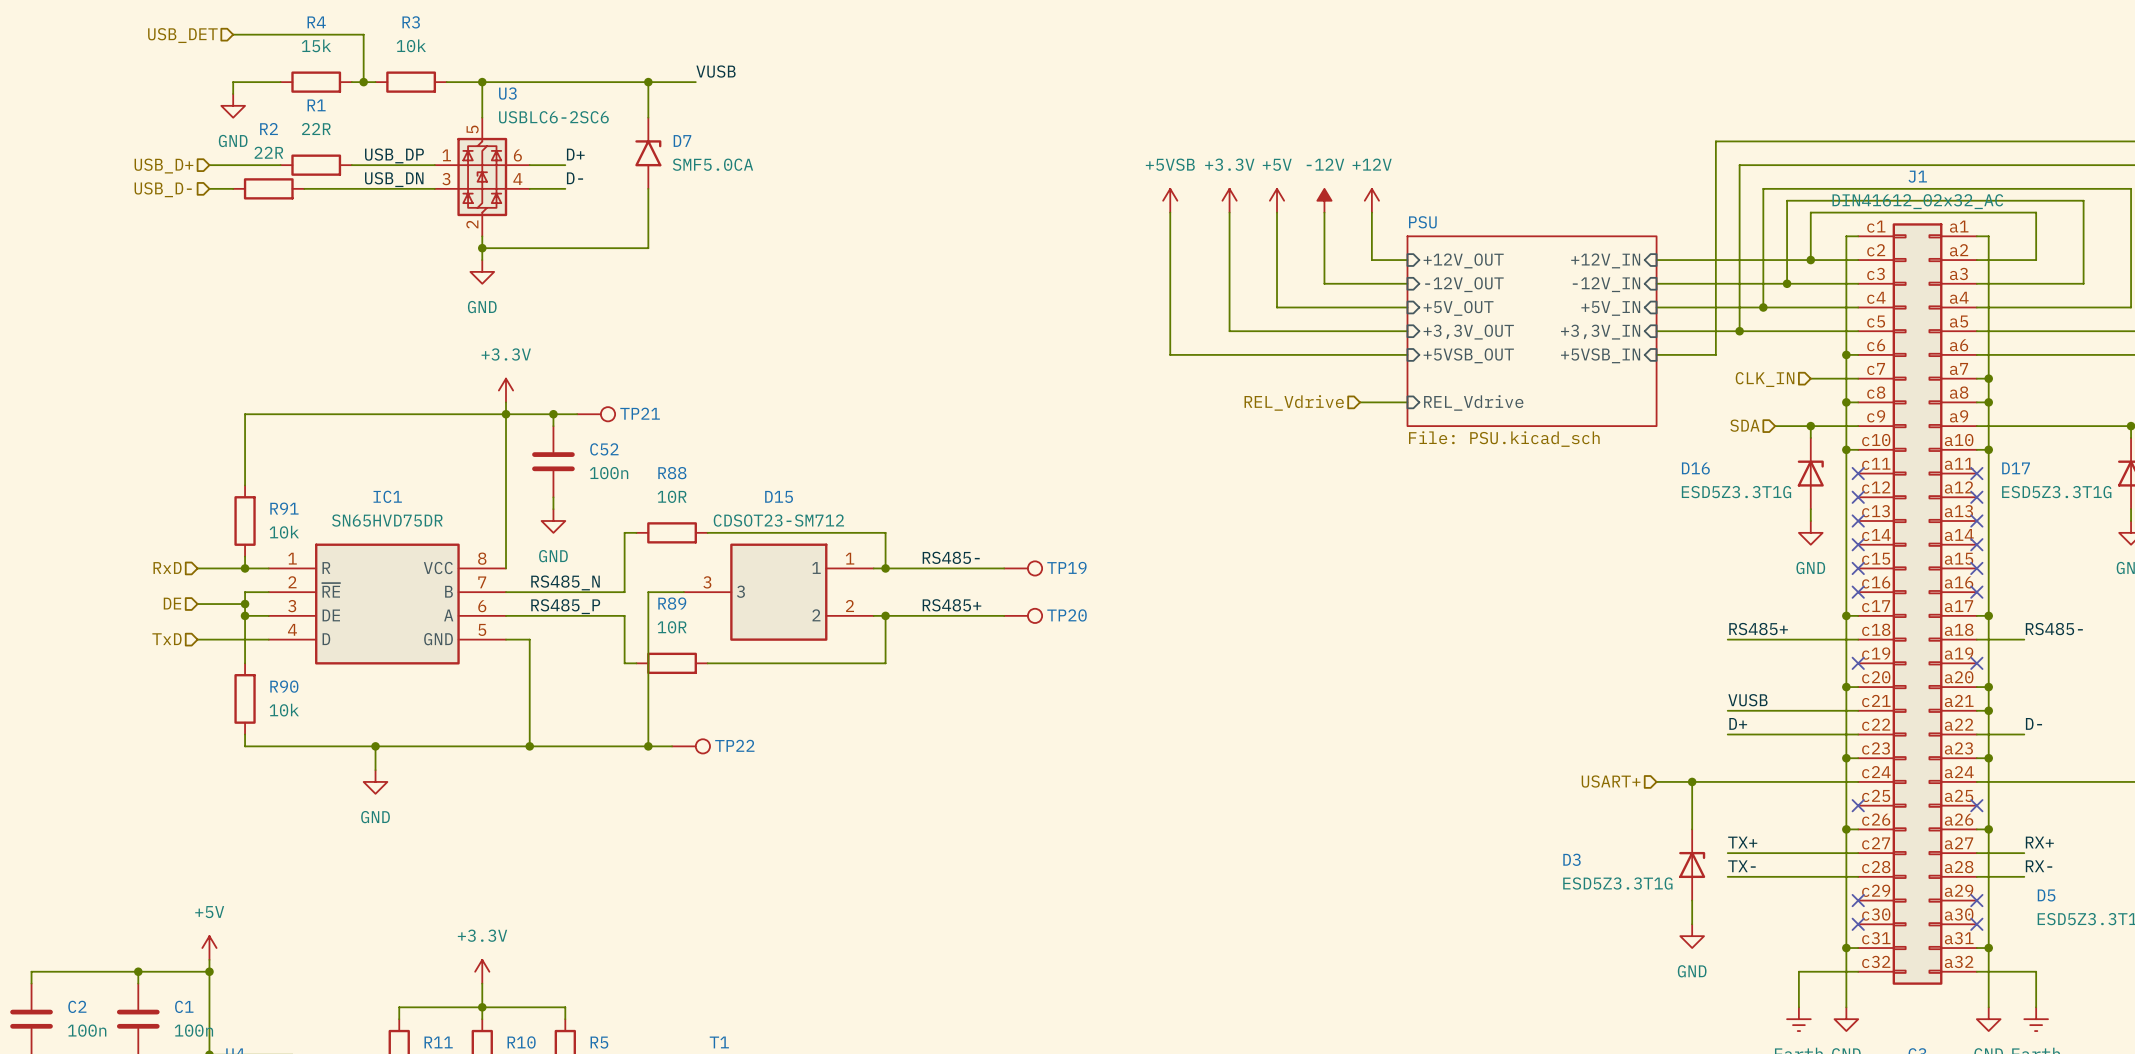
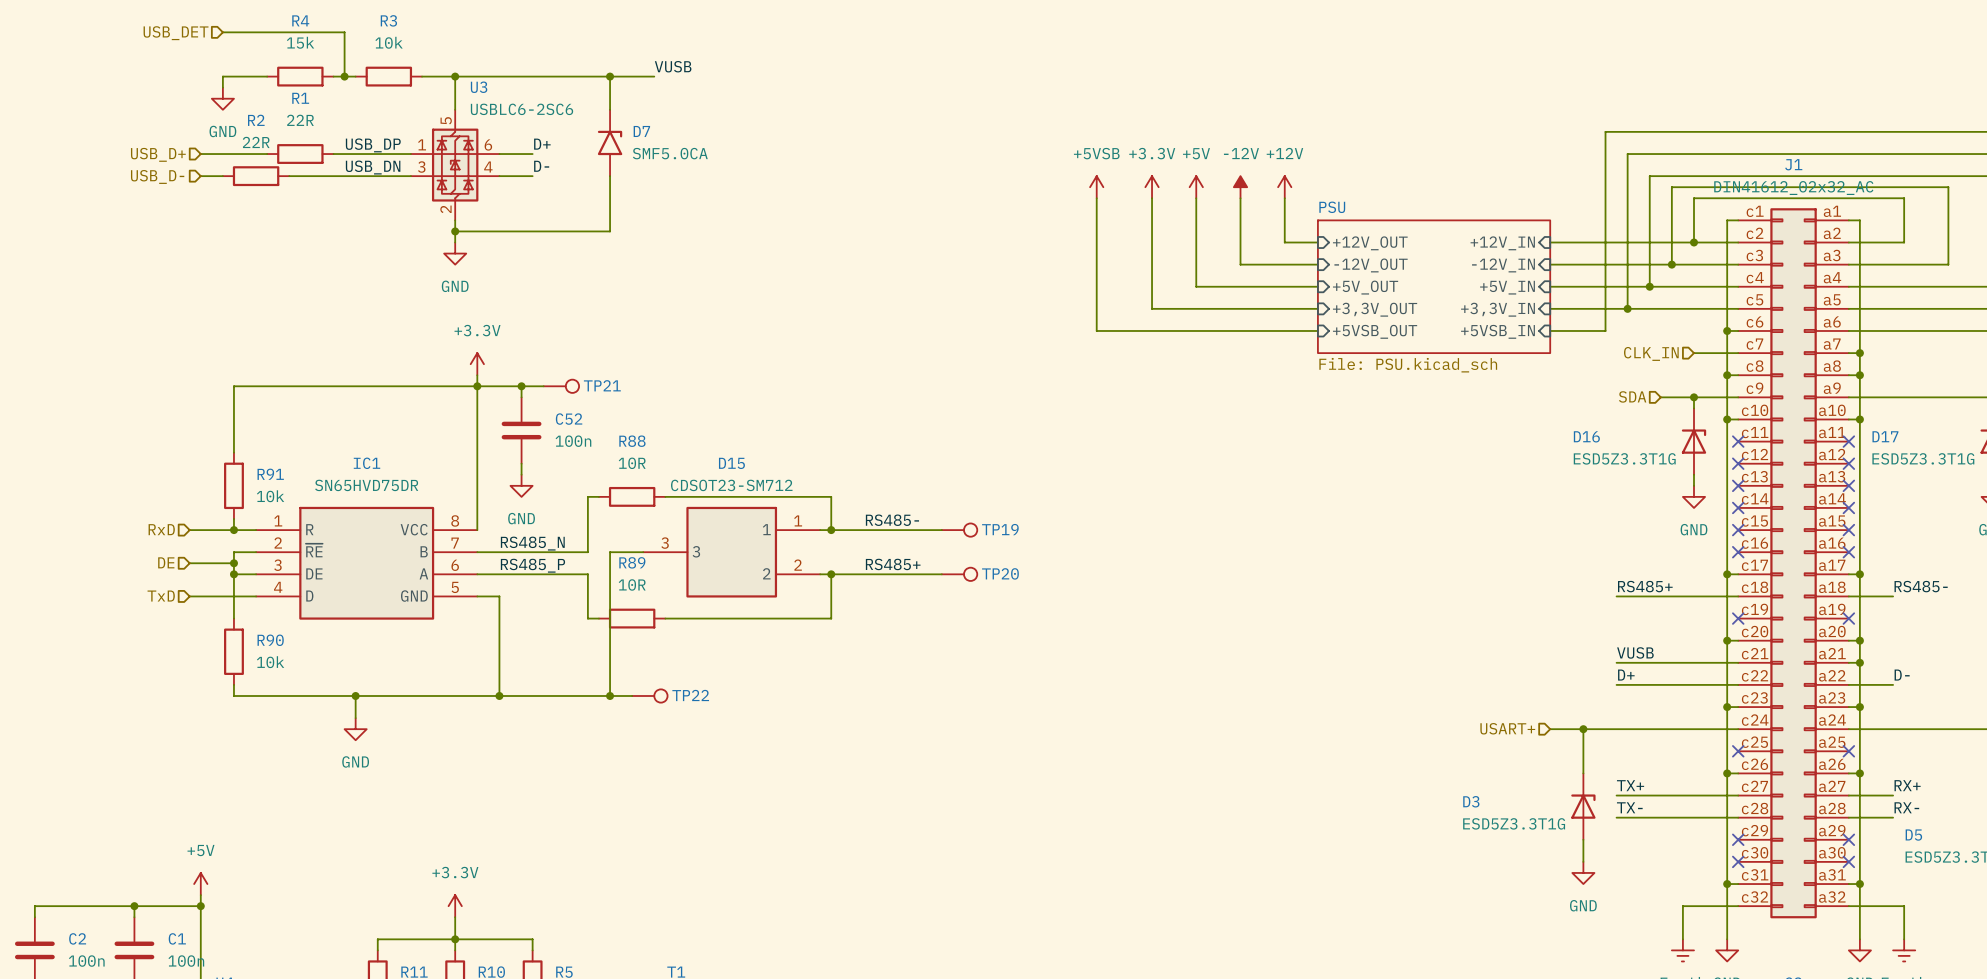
sheet PSU: none -> File: PSU.kicad_sch (1434, 286)
sheet PSU: File: PSU.kicad_sch (1532, 331) -> none
hierarchical label: REL_Vdrive (1294, 402) -> none
wire: (1360, 402) (1407, 402) -> none
sheet pin: REL_Vdrive (1473, 402) -> none

